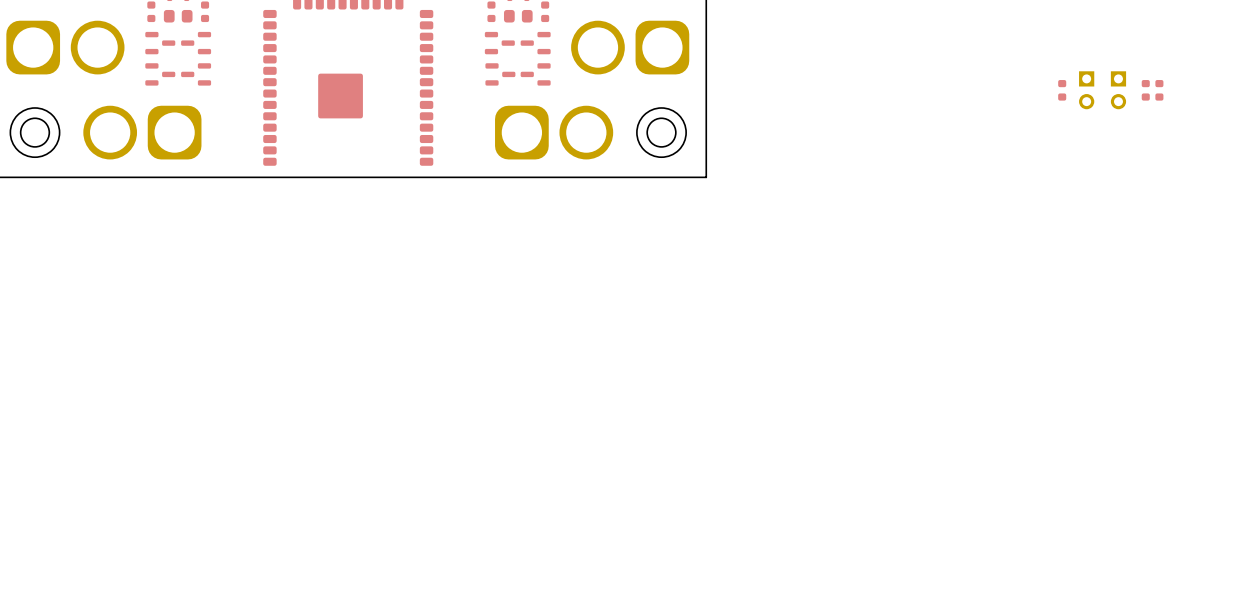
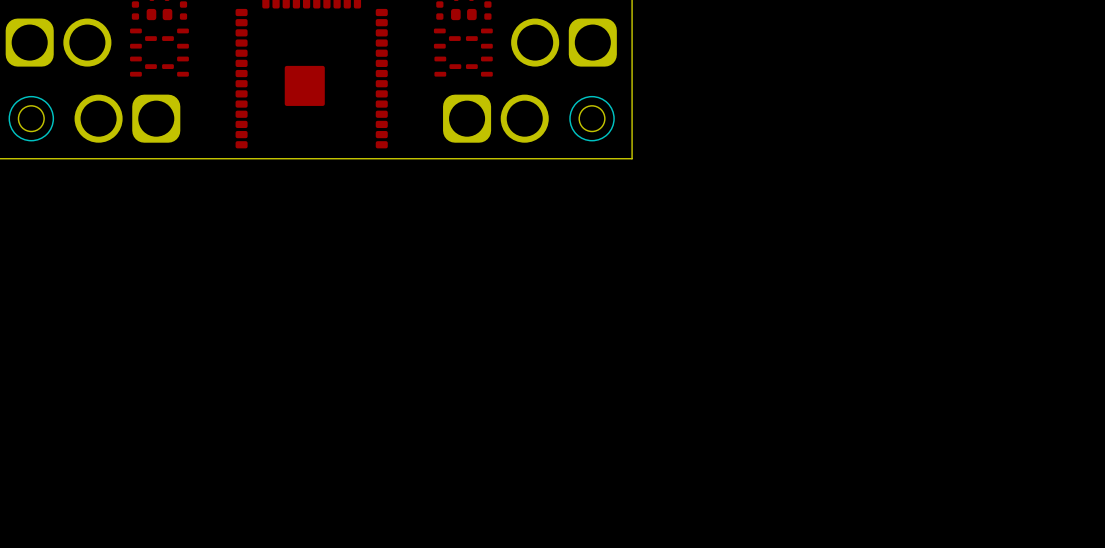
part: (1062, 90) -> none
part: (1086, 90) -> none
part: (1118, 90) -> none
part: (1145, 90) -> none
part: (1159, 90) -> none

